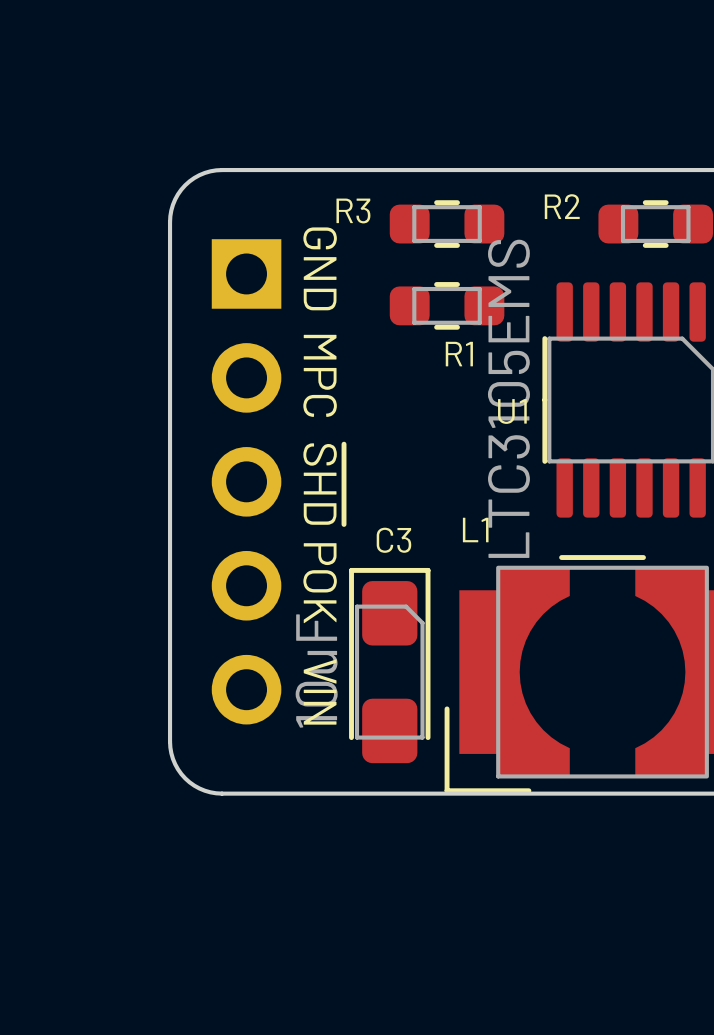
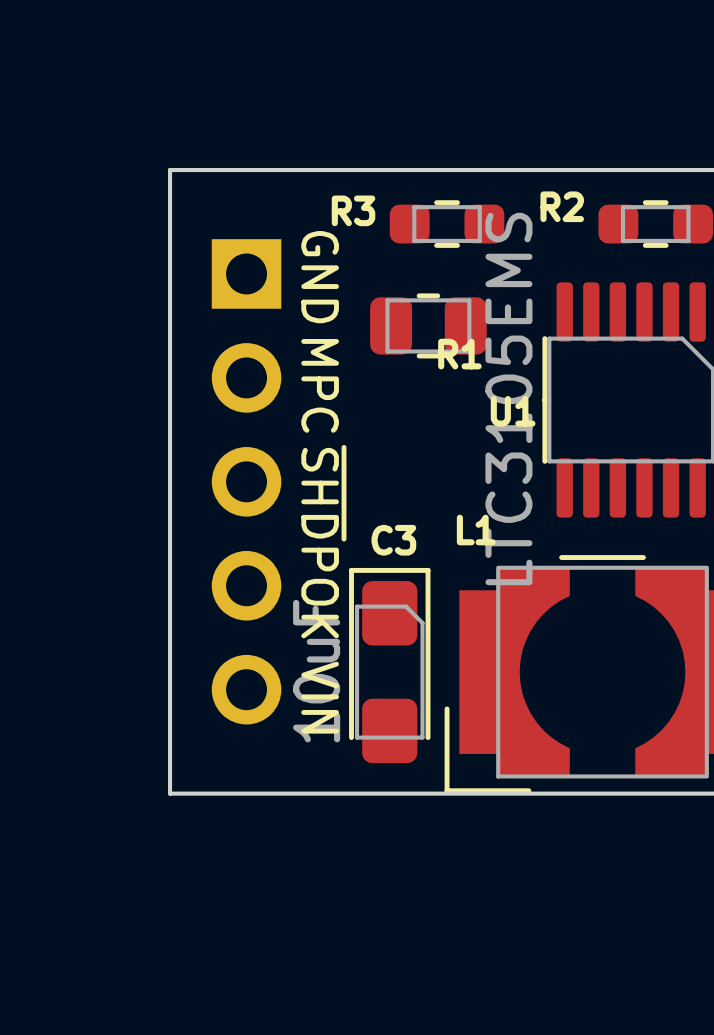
board edge: (222, 170) (204, 172) (185, 185) (175, 199) (170, 222) -> (222, 170) (170, 170) (170, 222)
R1 footprint: [389, 282, 505, 330] -> [370, 293, 487, 359]
board edge: (170, 741) (172, 758) (185, 778) (199, 788) (222, 793) -> (170, 741) (170, 793) (222, 793)

